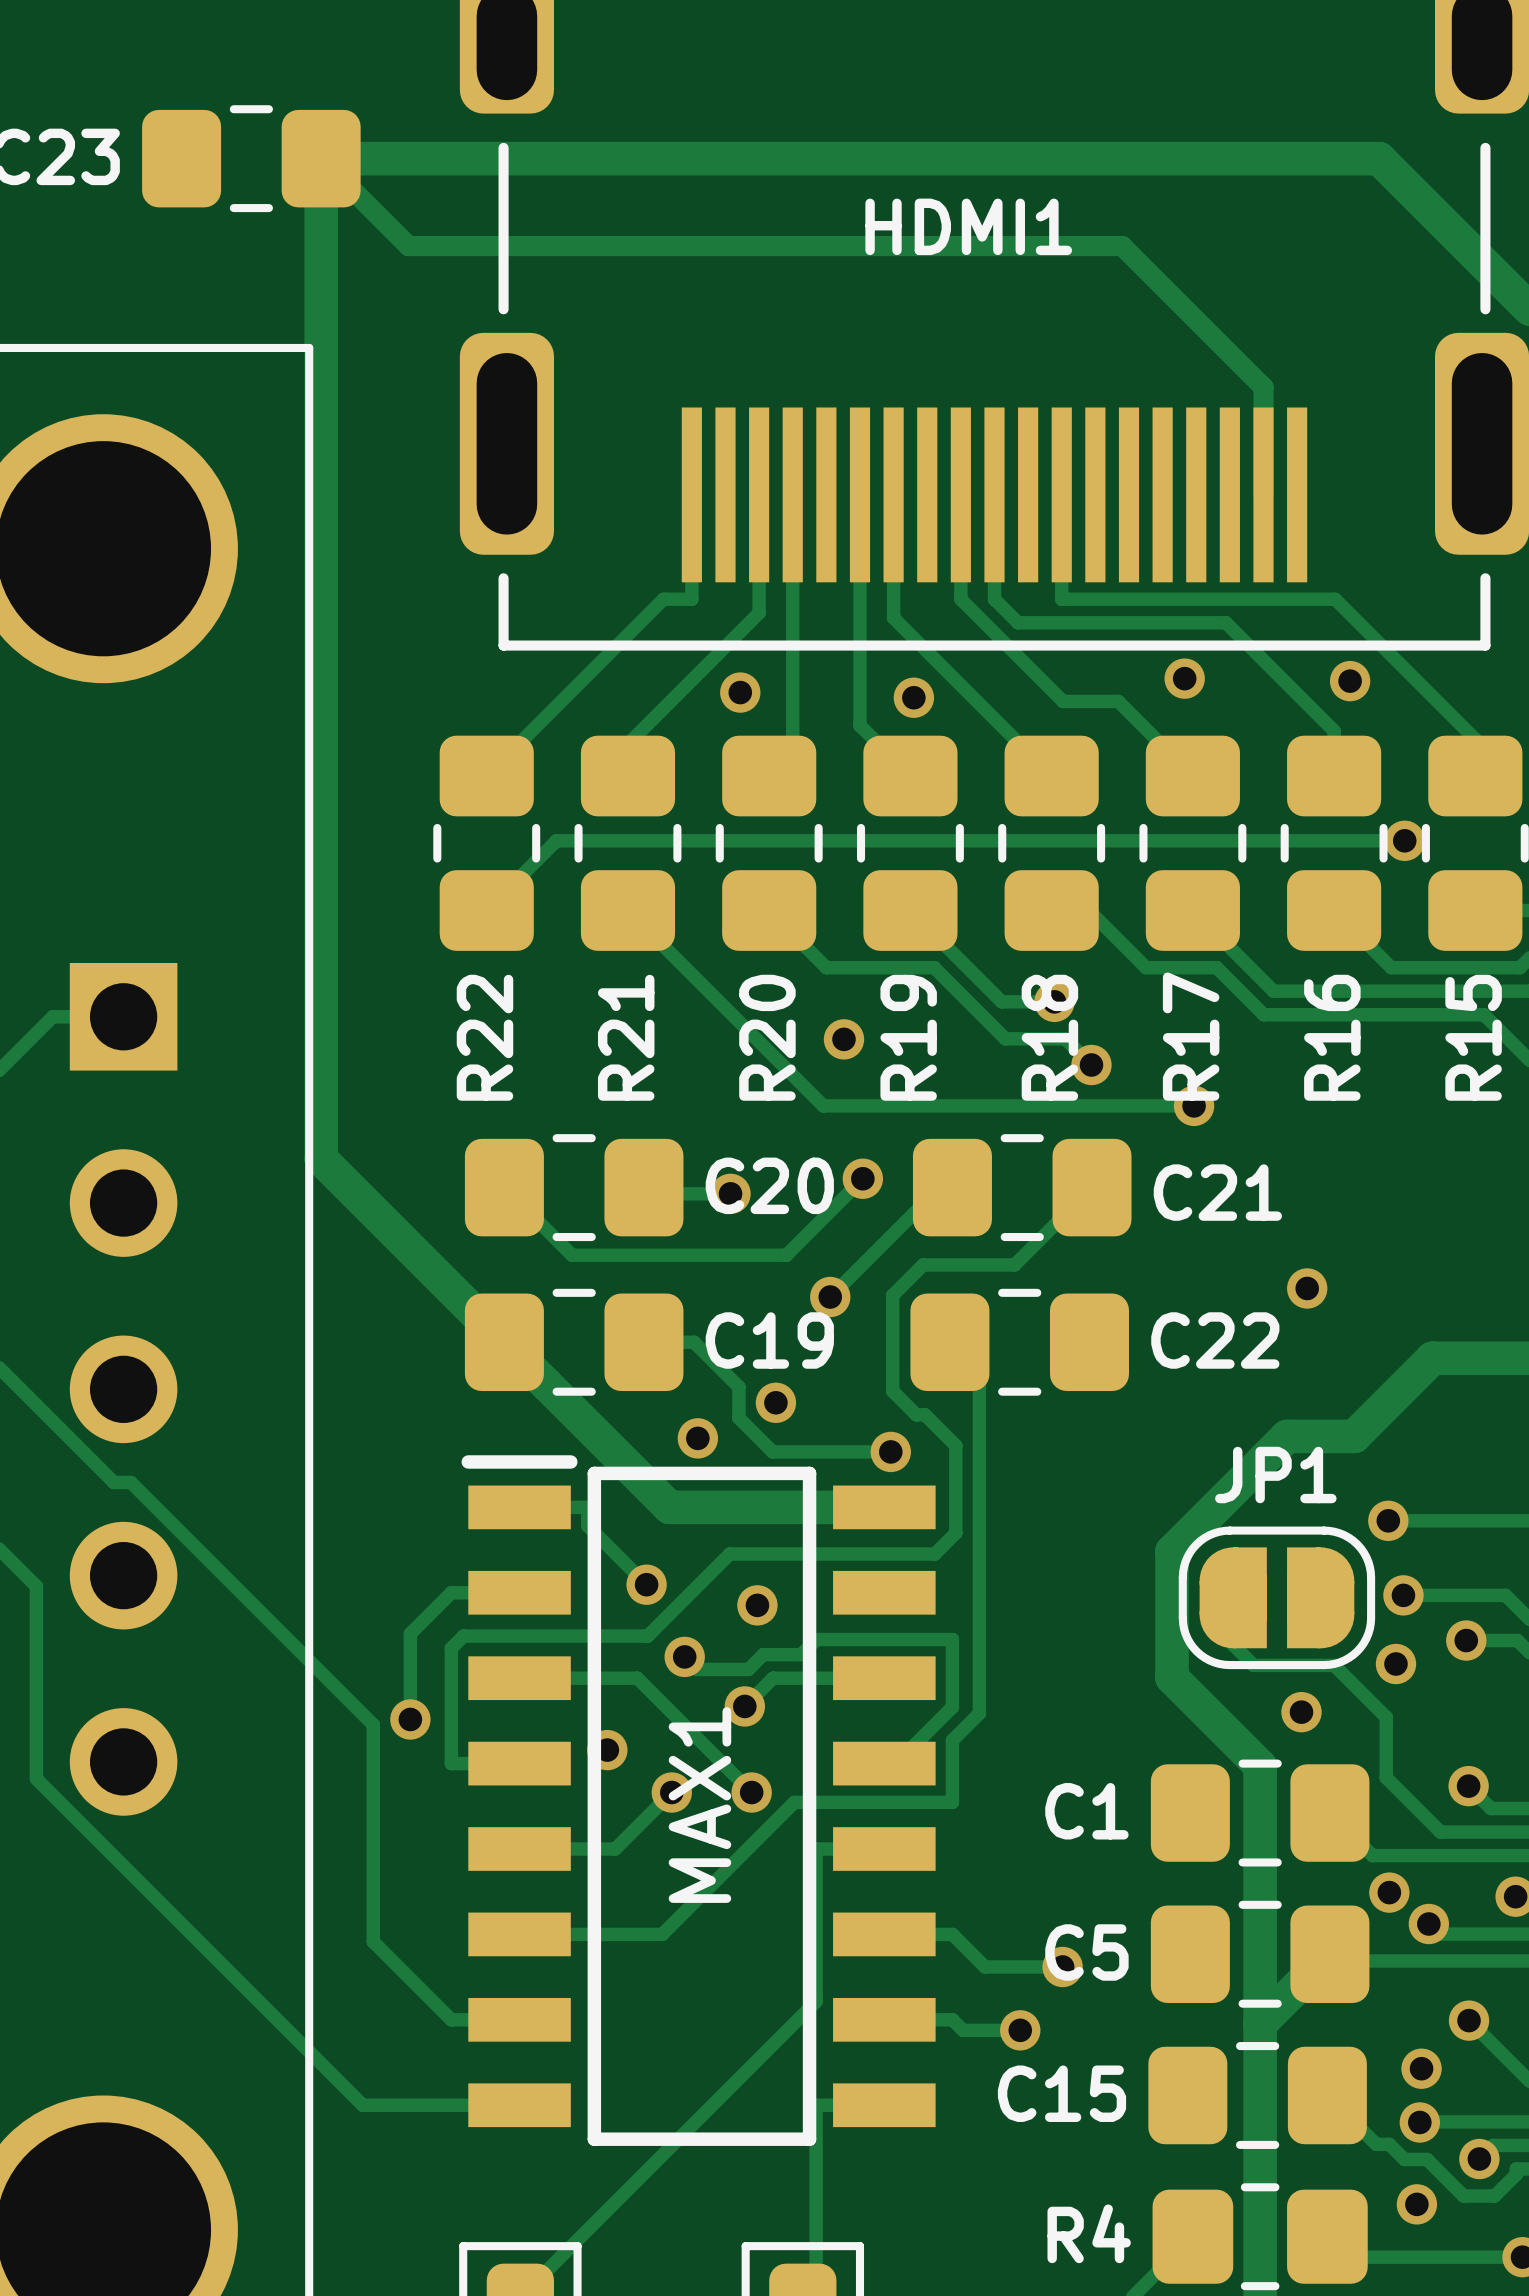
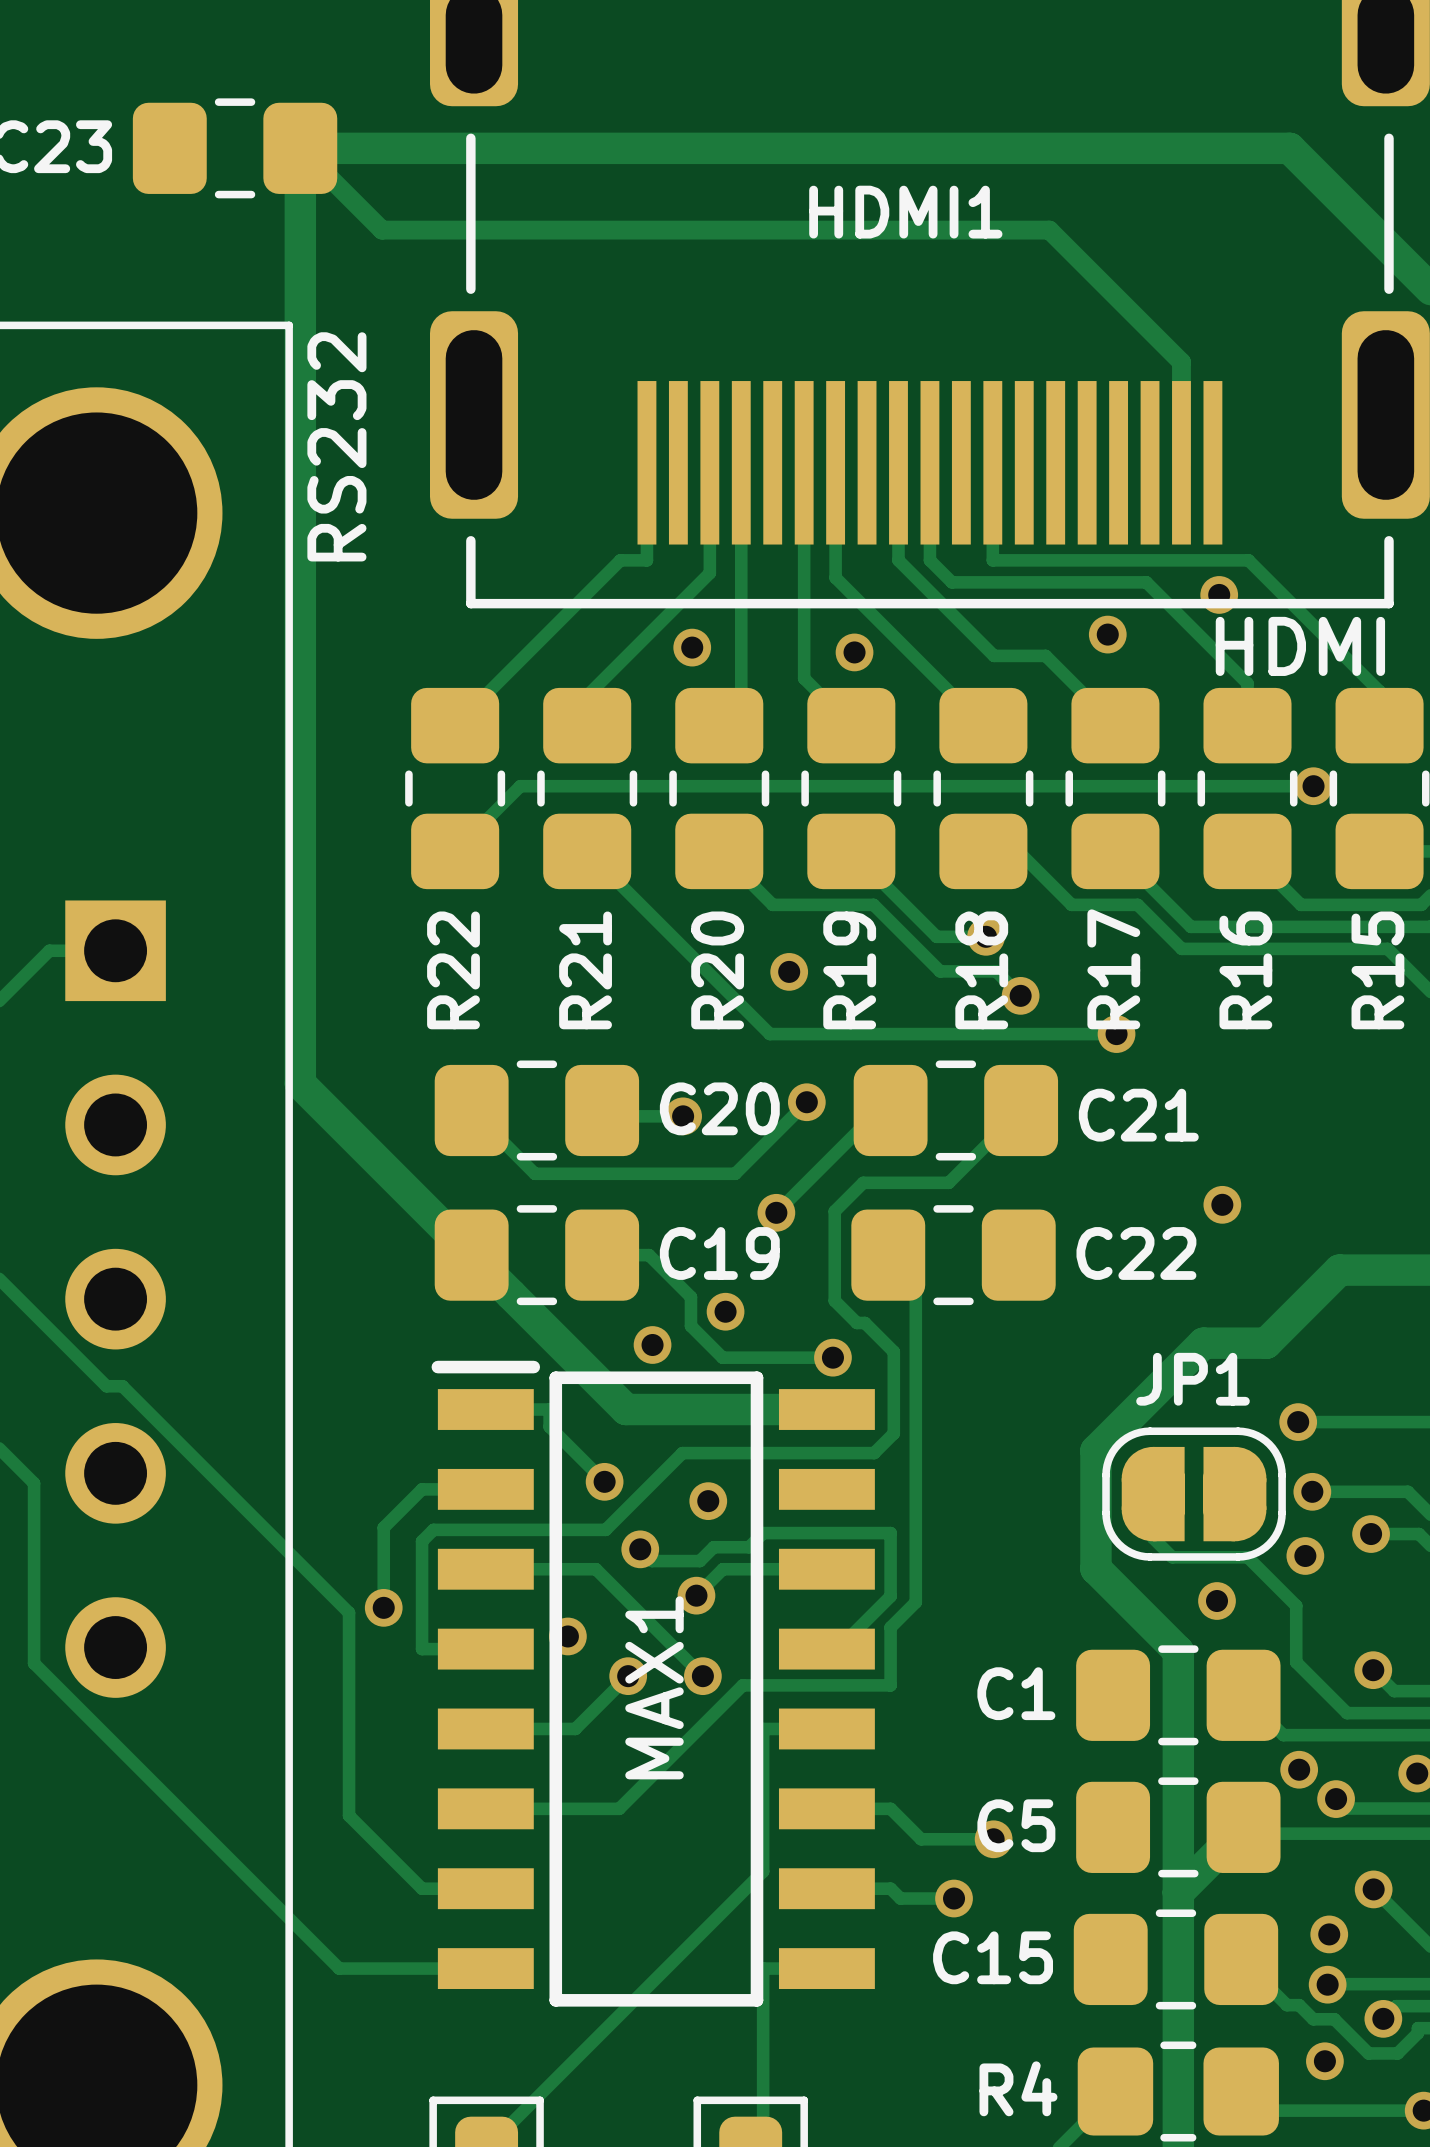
text: none -> RS232 (336, 446)
via position: (1350, 681) -> (1219, 594)
text: none -> HDMI (1300, 646)

